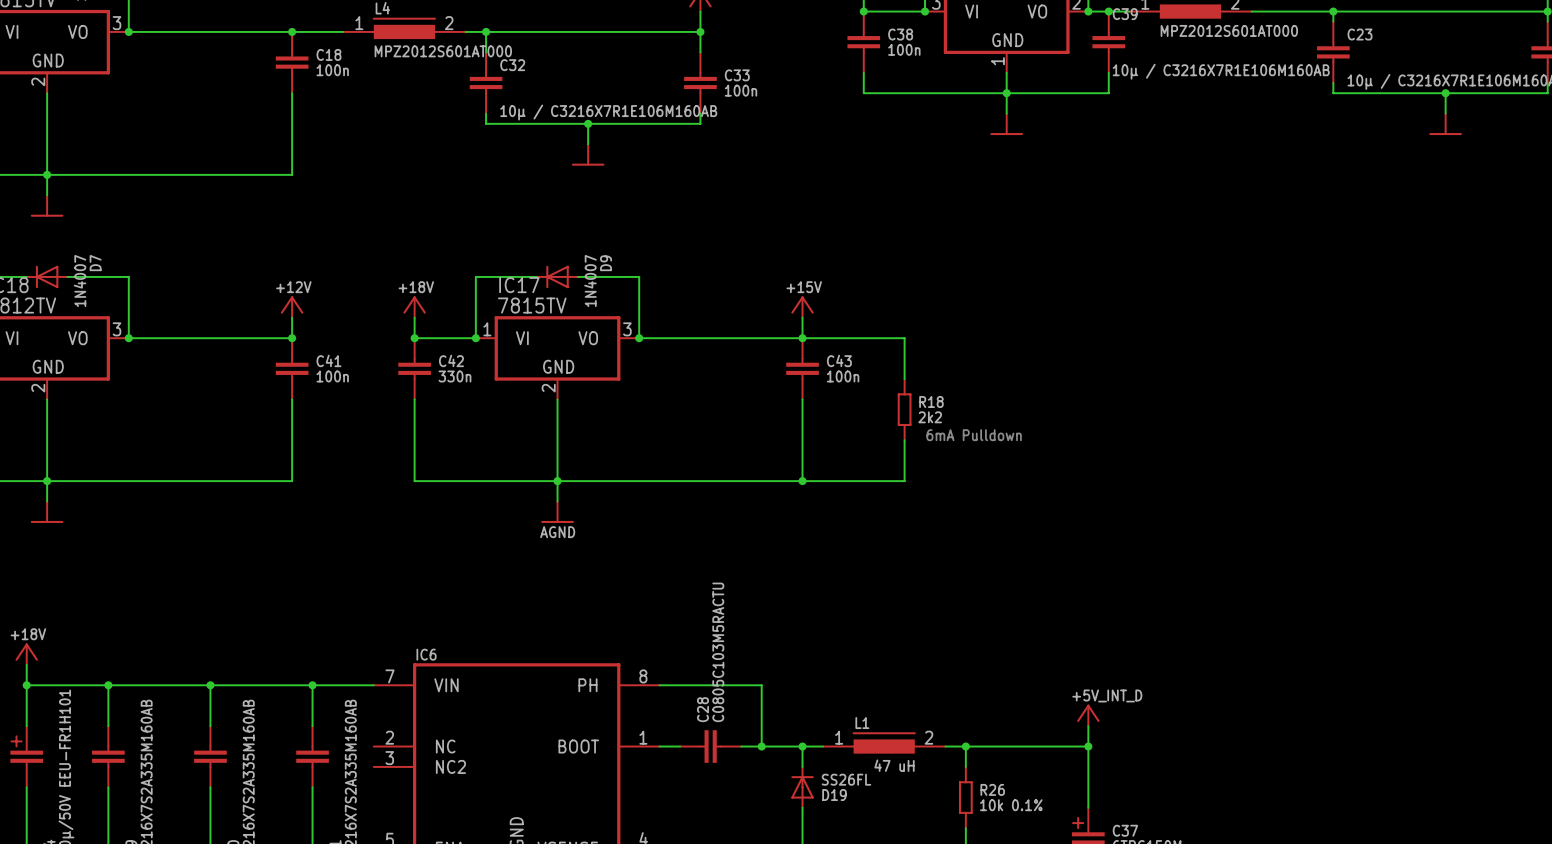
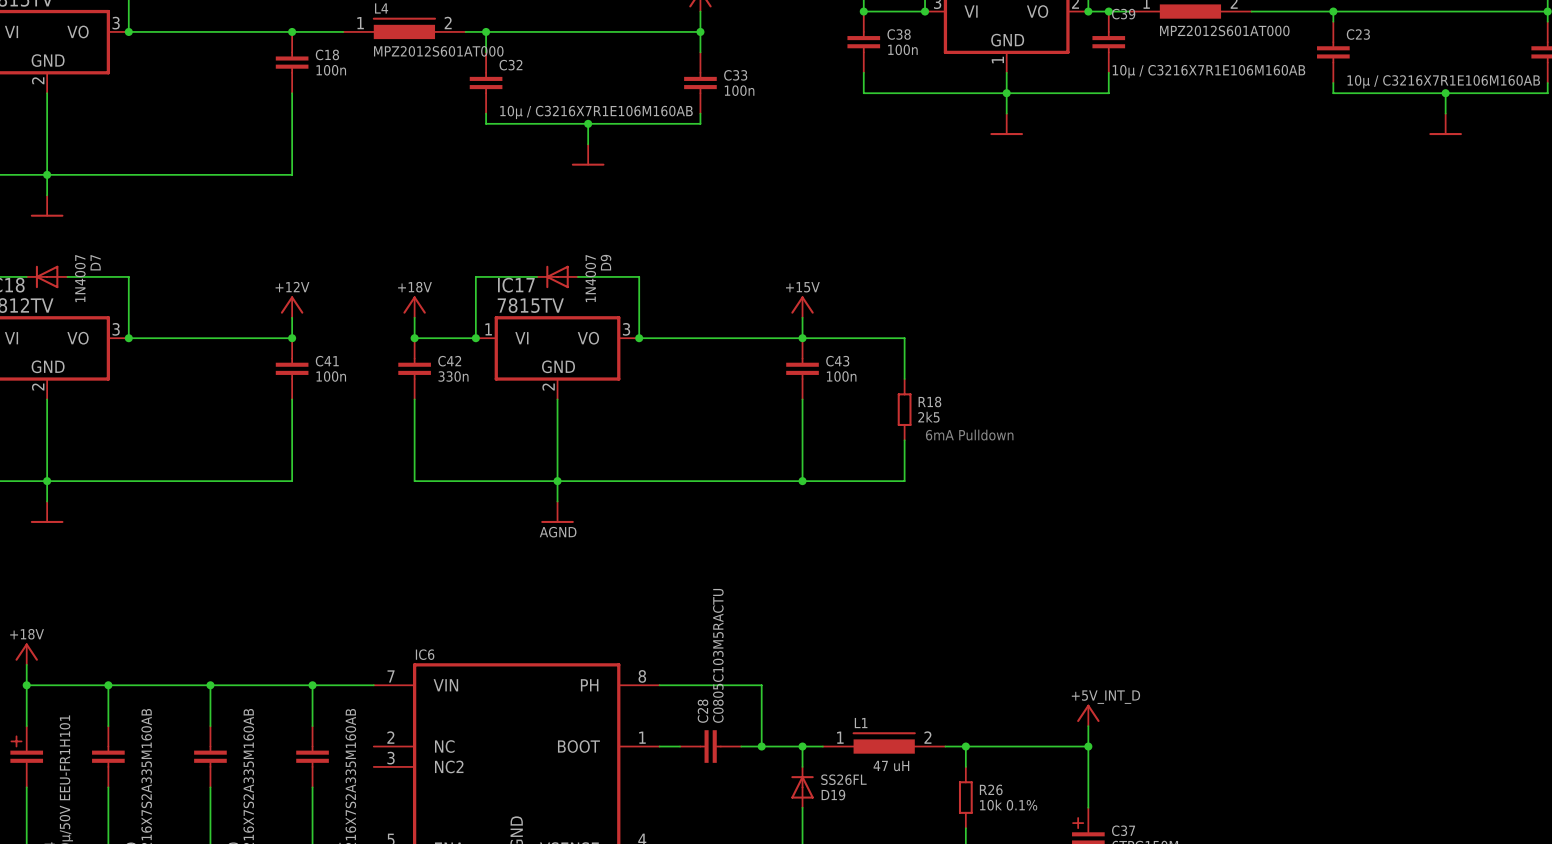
R18 value: 2k2 (930, 417) -> 2k5 (928, 417)

